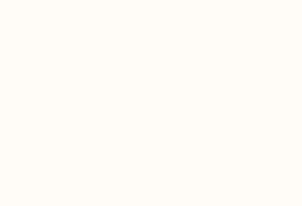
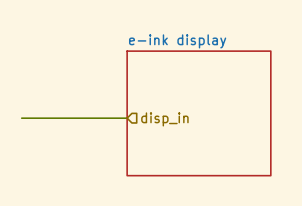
sheet e-ink display: none -> (198, 113)
wire: none -> (21, 118) (127, 118)
hierarchical label: none -> disp_in (164, 119)

